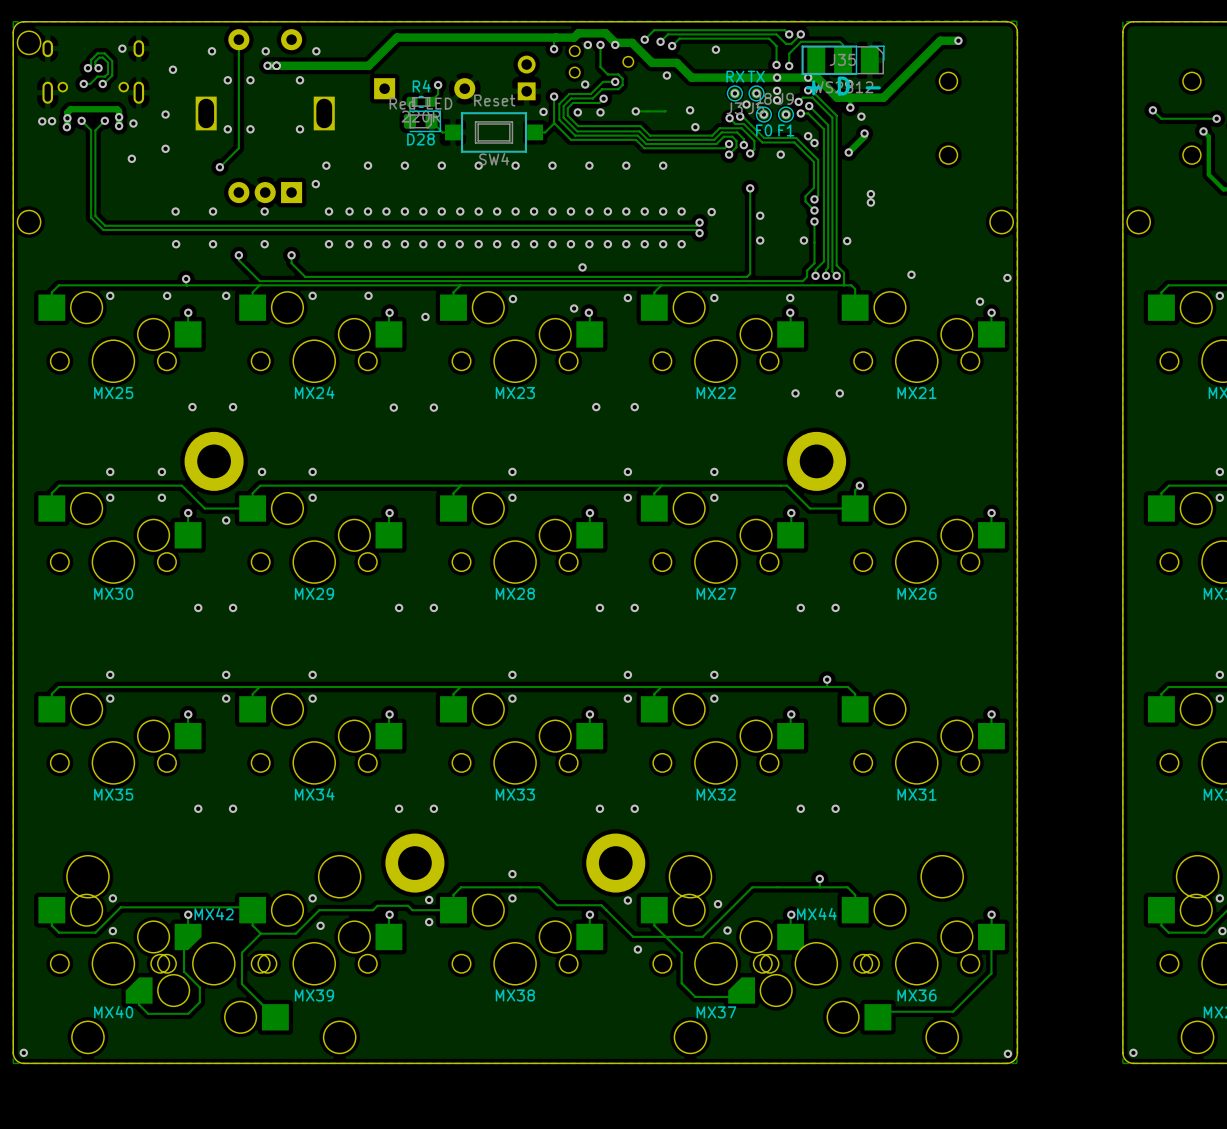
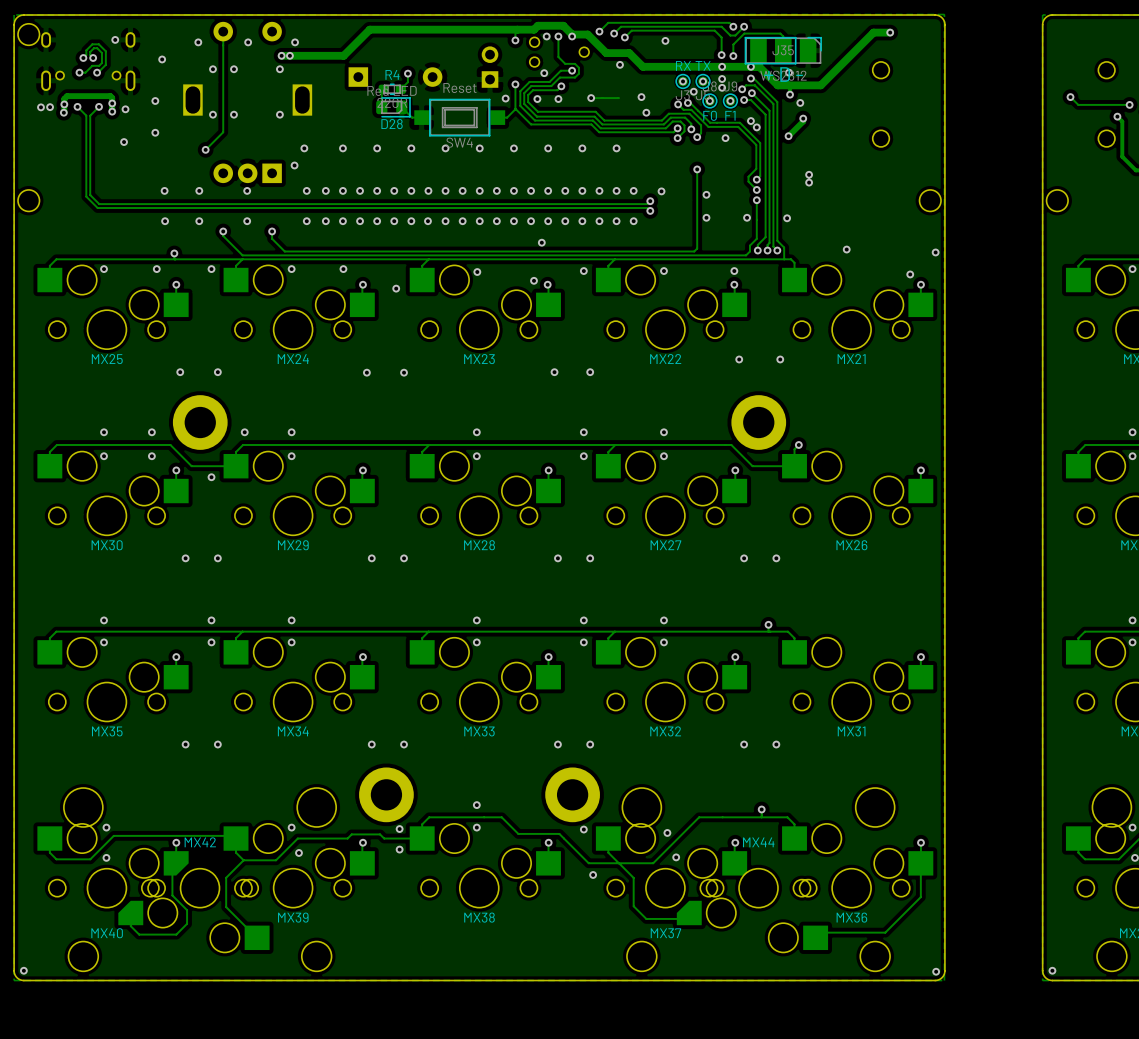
via: (267, 65) -> none
via: (276, 65) -> none
track: (301, 65) (267, 65) -> none
via: none -> (281, 55)
via: none -> (289, 55)

